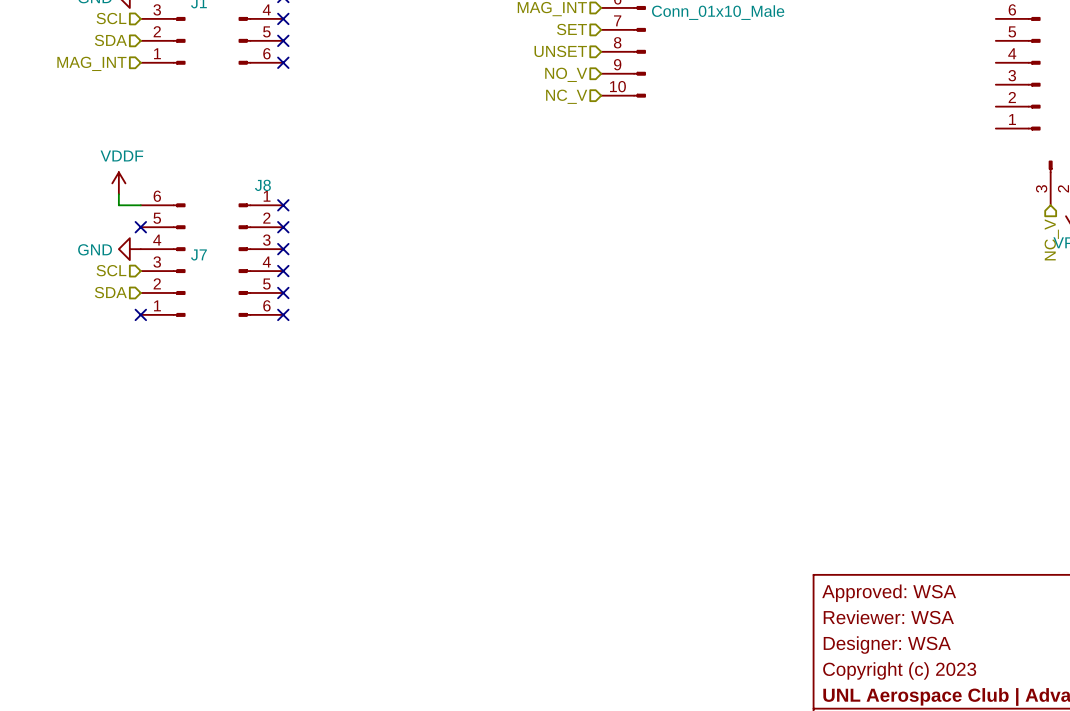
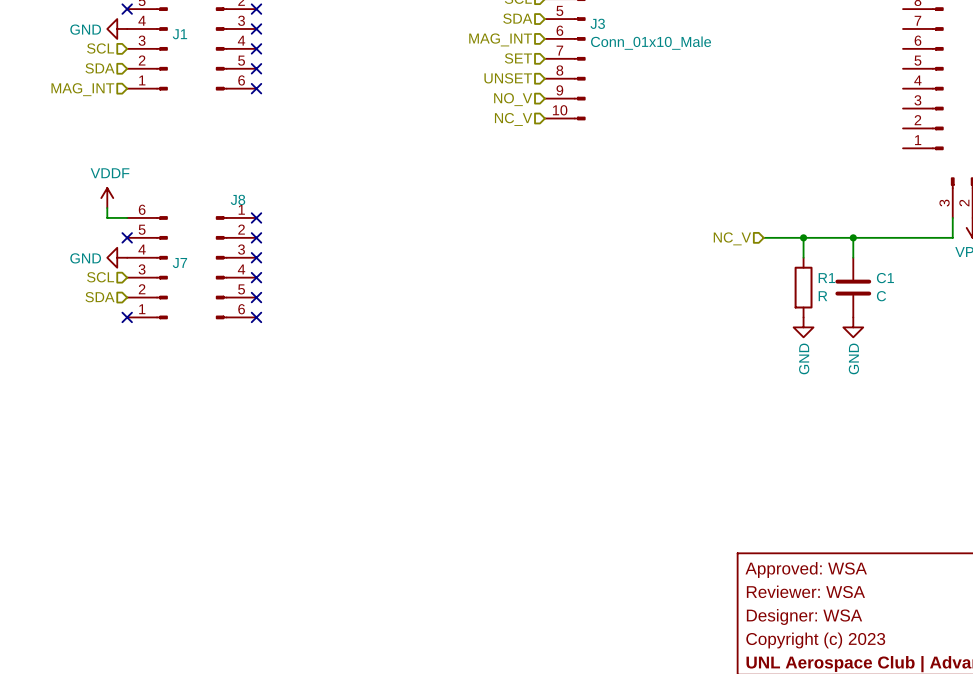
wire: none -> (952, 217) (952, 237) (763, 237)
wire: none -> (803, 237) (803, 257)
junction: none -> (803, 237)
wire: none -> (853, 237) (853, 257)
junction: none -> (853, 237)
hierarchical label: none -> NC_V (732, 238)
hierarchical label: NC_V (1051, 239) -> none
R1: none -> R (803, 287)
C1: none -> C (853, 287)
power symbol: none -> GND (803, 327)
power symbol: none -> GND (853, 327)

